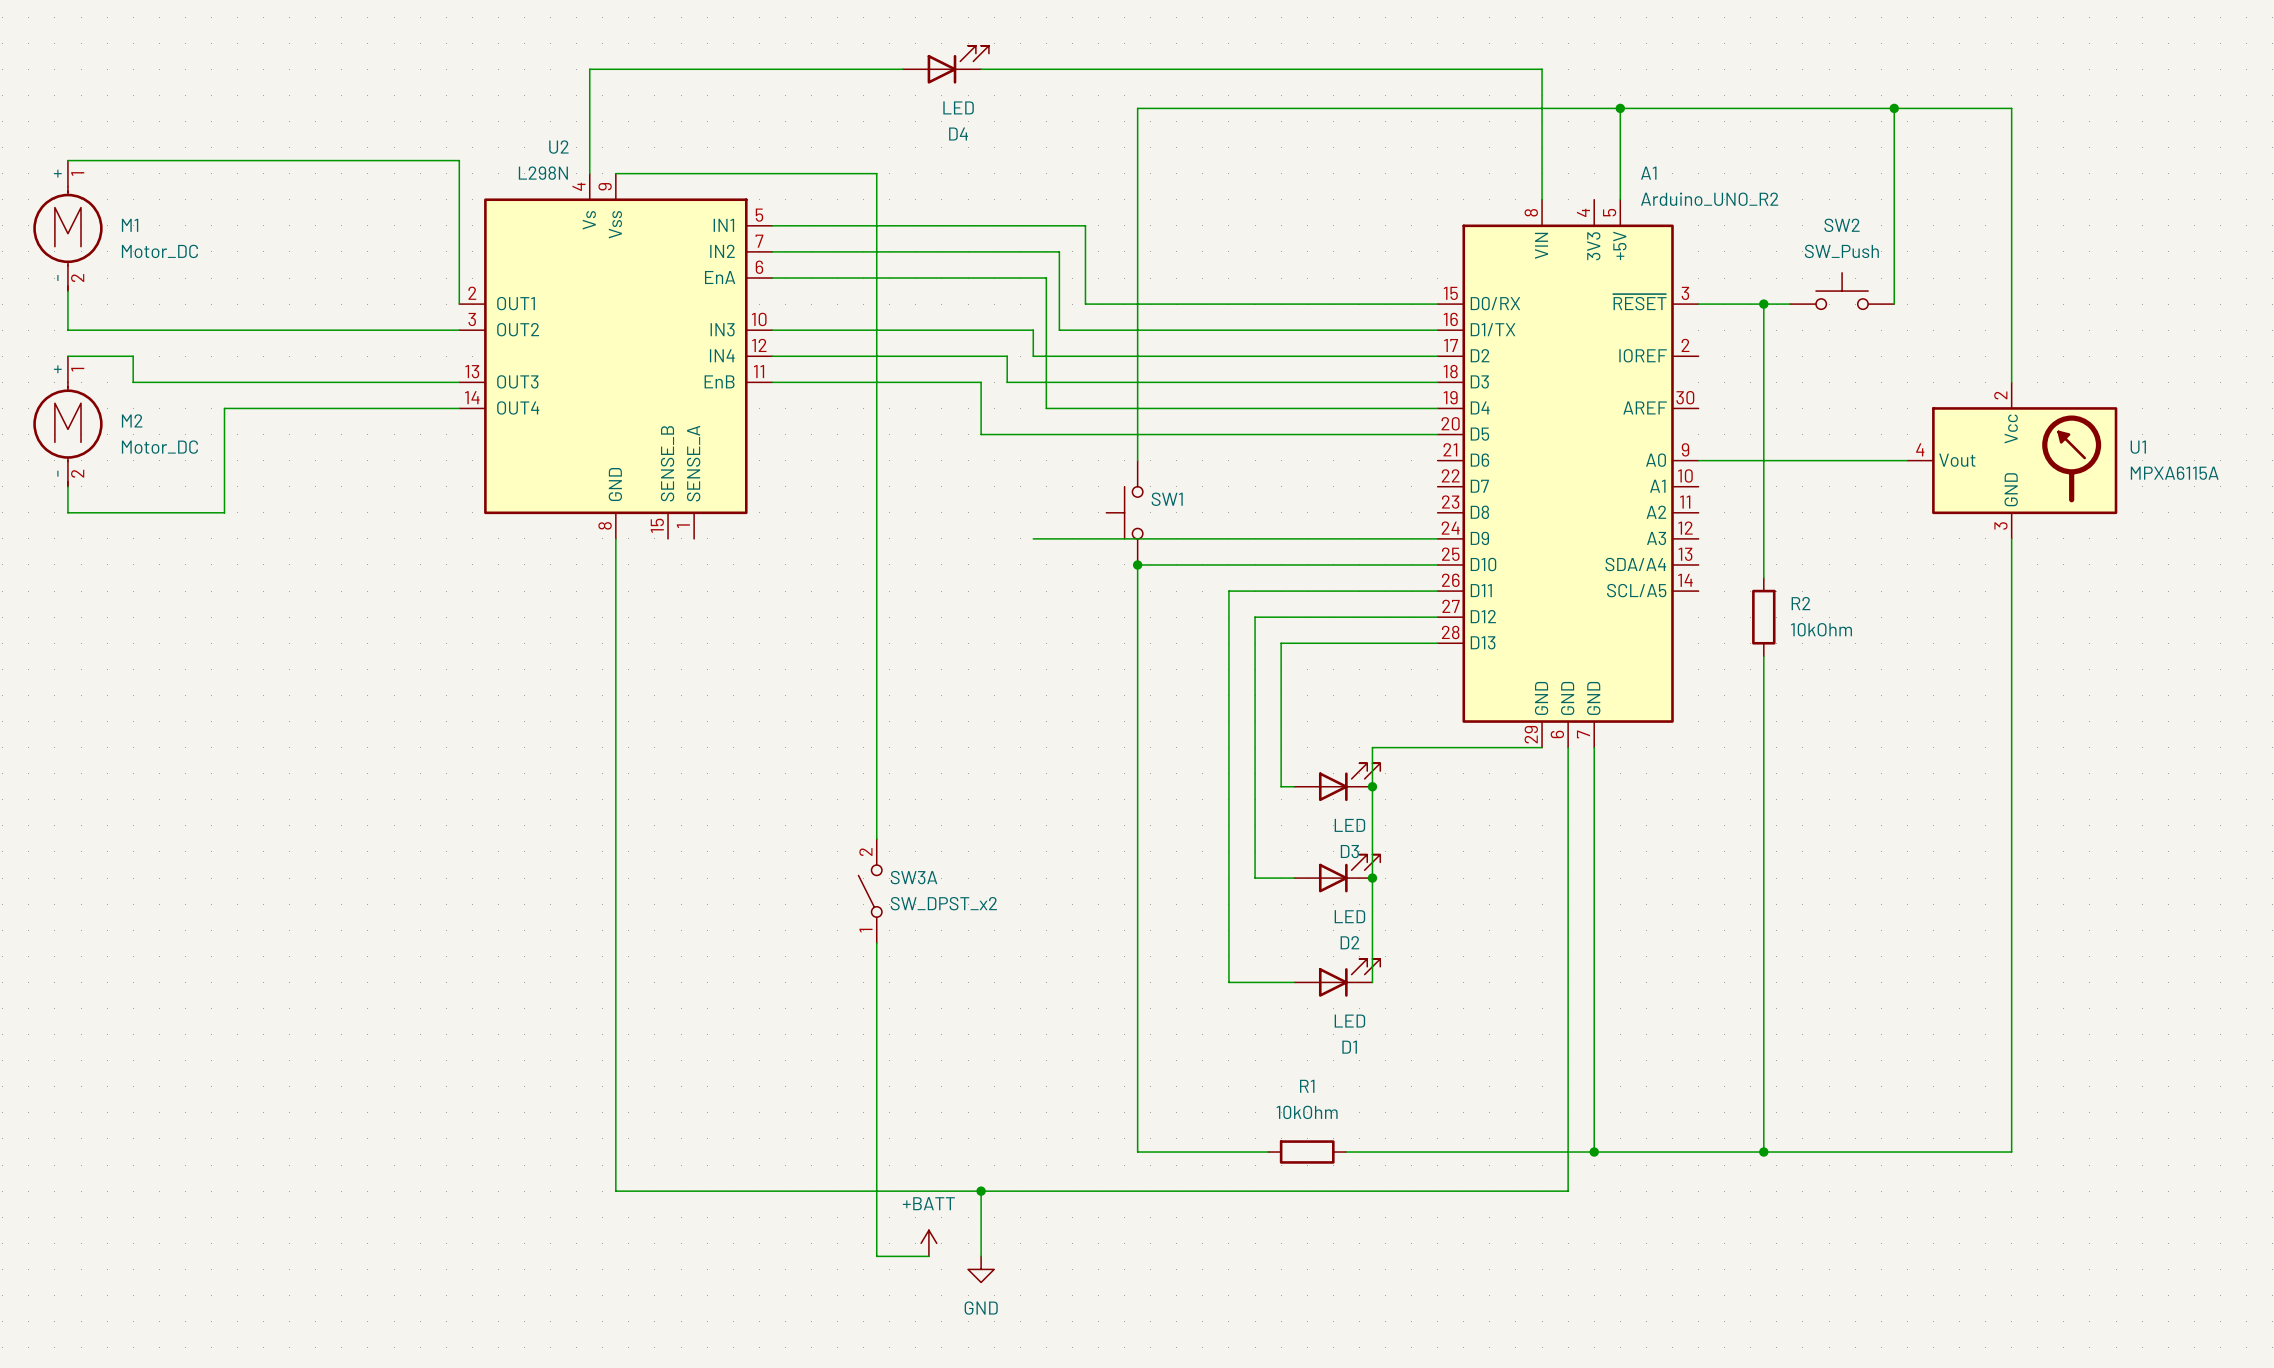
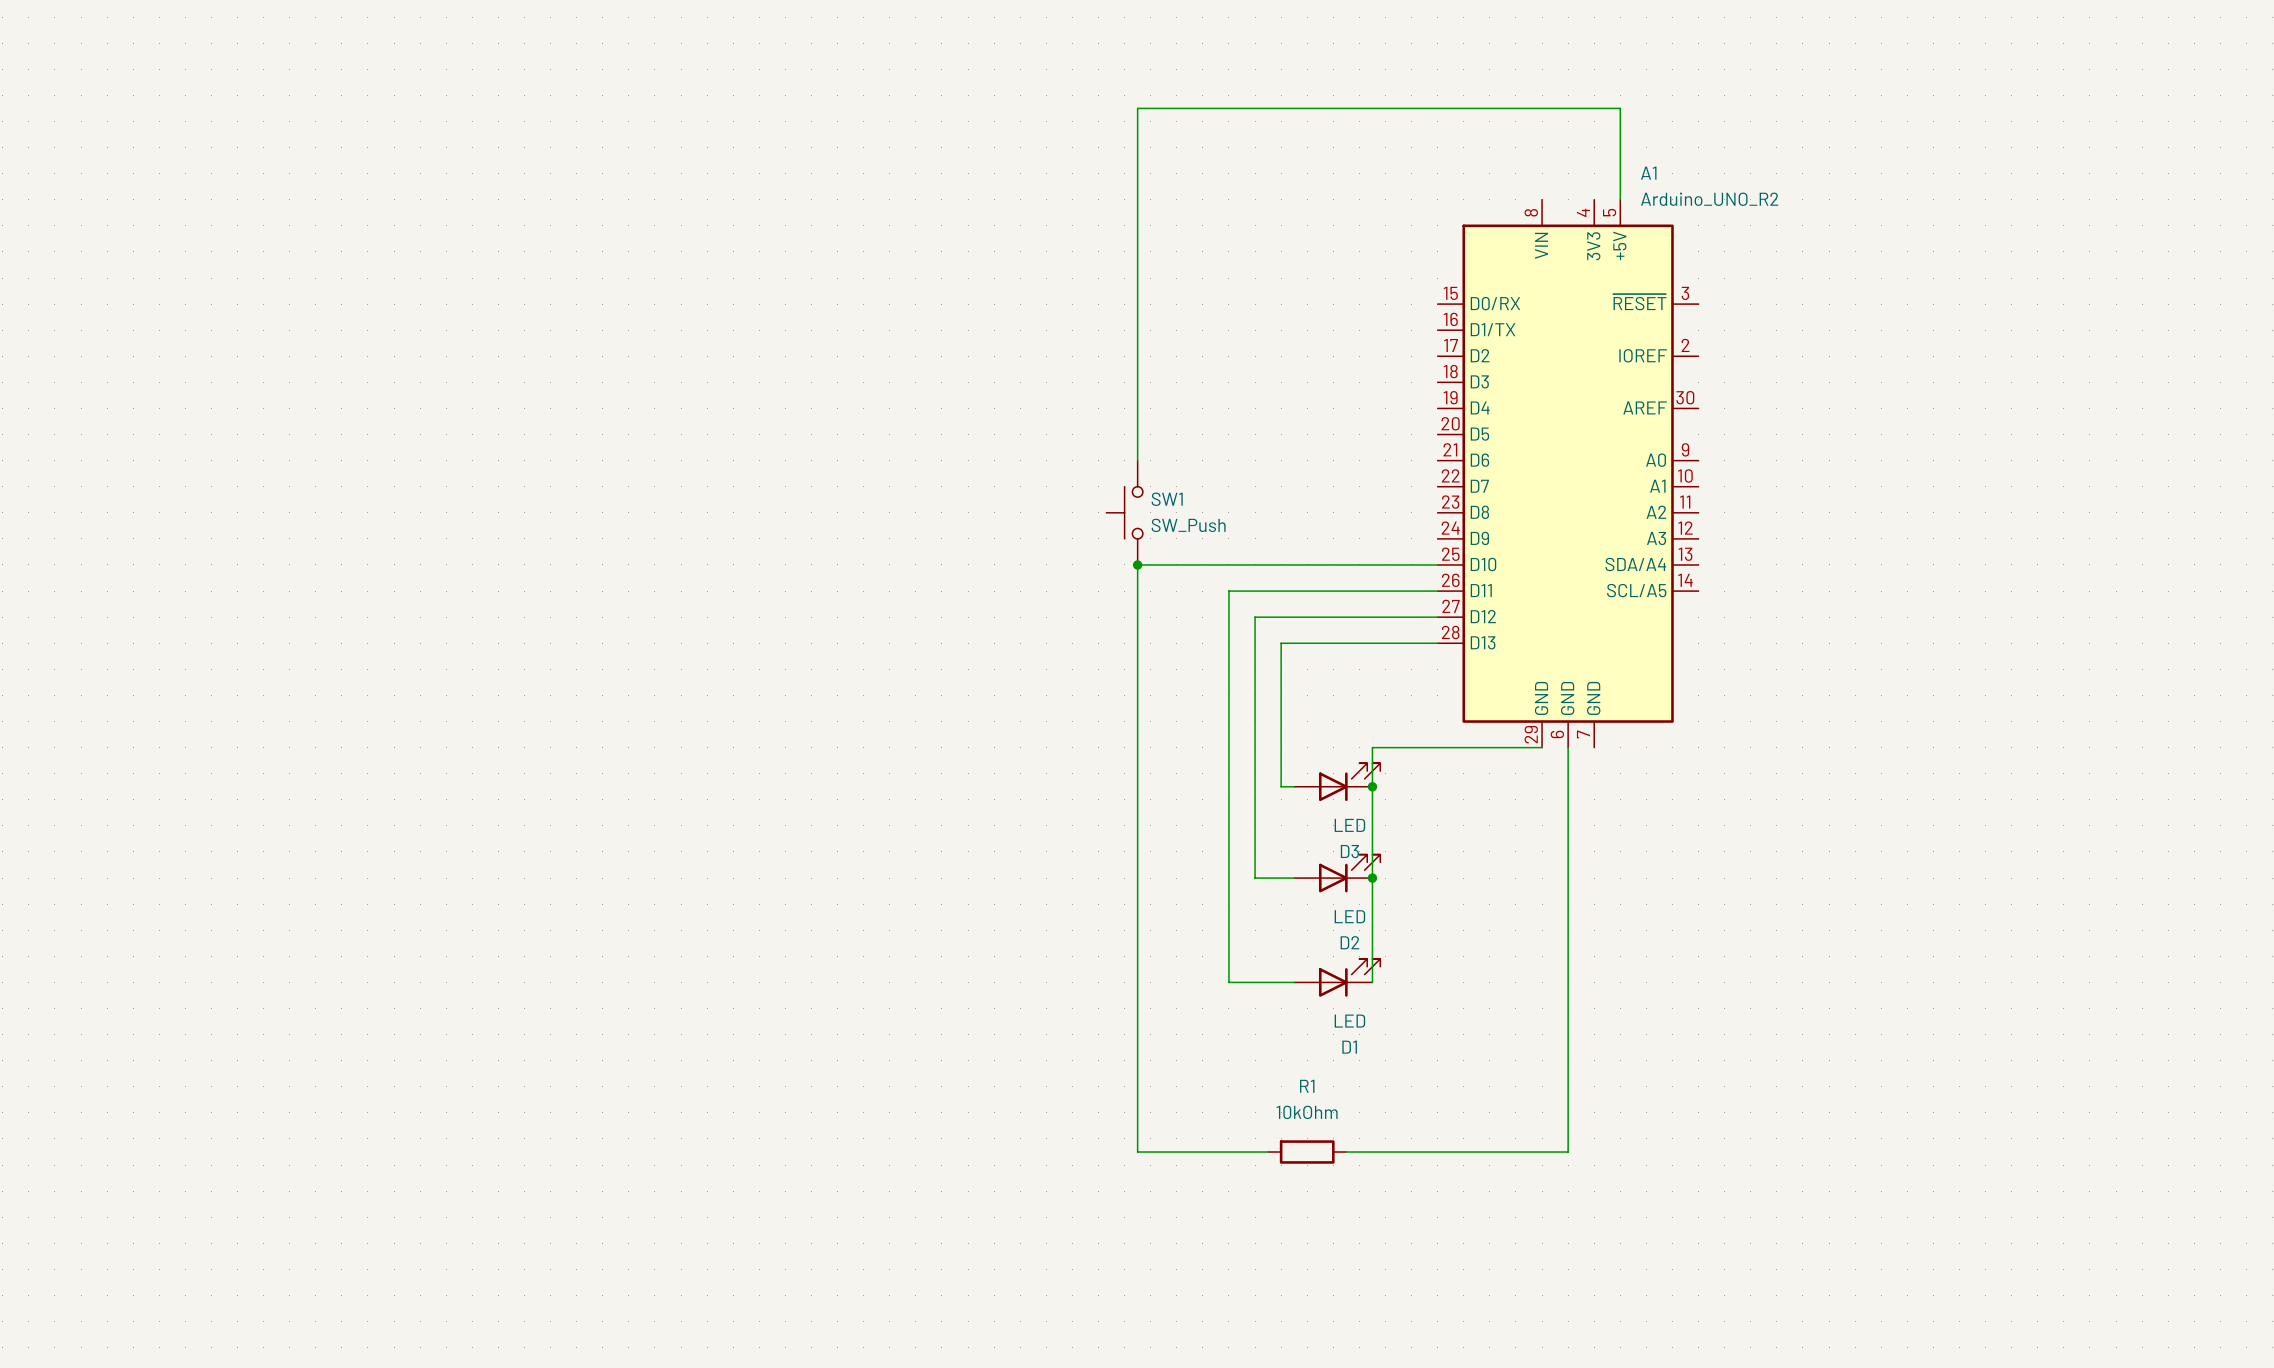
D4: LED (945, 64) -> none
wire: (902, 69) (589, 69) (589, 173) -> none
wire: (981, 69) (1542, 69) (1542, 199) -> none
wire: (1620, 108) (2011, 108) (2011, 382) -> none
junction: (1620, 108) -> none
wire: (1894, 108) (1894, 304) -> none
junction: (1894, 108) -> none
wire: (67, 160) (459, 160) (459, 304) -> none
wire: (615, 173) (876, 173) (876, 838) -> none
M1: Motor_DC (67, 225) -> none
wire: (772, 225) (1085, 225) (1085, 304) (1437, 304) -> none
wire: (772, 251) (1059, 251) (1059, 330) (1437, 330) -> none
wire: (772, 278) (1046, 278) (1046, 408) (1437, 408) -> none
wire: (67, 291) (67, 330) (459, 330) -> none
SW2: SW_Push (1842, 291) -> none
wire: (1698, 304) (1789, 304) -> none
wire: (1763, 304) (1763, 578) -> none
junction: (1763, 304) -> none
wire: (772, 330) (1033, 330) (1033, 356) (1437, 356) -> none
wire: (67, 356) (133, 356) (133, 382) (459, 382) -> none
U2: L298N (615, 356) -> none
wire: (772, 356) (1007, 356) (1007, 382) (1437, 382) -> none
wire: (772, 382) (981, 382) (981, 434) (1437, 434) -> none
wire: (459, 408) (224, 408) (224, 512) (67, 512) (67, 486) -> none
M2: Motor_DC (67, 421) -> none
wire: (1698, 460) (1907, 460) -> none
U1: MPXA6115A (2012, 460) -> none
SW1 value: none -> SW_Push (1188, 525)
wire: (615, 538) (615, 1191) (1568, 1191) (1568, 1152) (2011, 1152) (2011, 538) -> none
wire: (1033, 538) (1437, 538) -> none
R2: 10kOhm (1763, 617) -> none
wire: (1763, 656) (1763, 1152) -> none
wire: (1594, 747) (1594, 1152) -> none
SW3A: SW_DPST_x2 (870, 891) -> none
wire: (876, 943) (876, 1256) (928, 1256) -> none
junction: (1594, 1152) -> none
junction: (1763, 1152) -> none
wire: (981, 1191) (981, 1256) -> none
junction: (981, 1191) -> none
power symbol: +BATT (928, 1243) -> none
power symbol: GND (981, 1269) -> none

